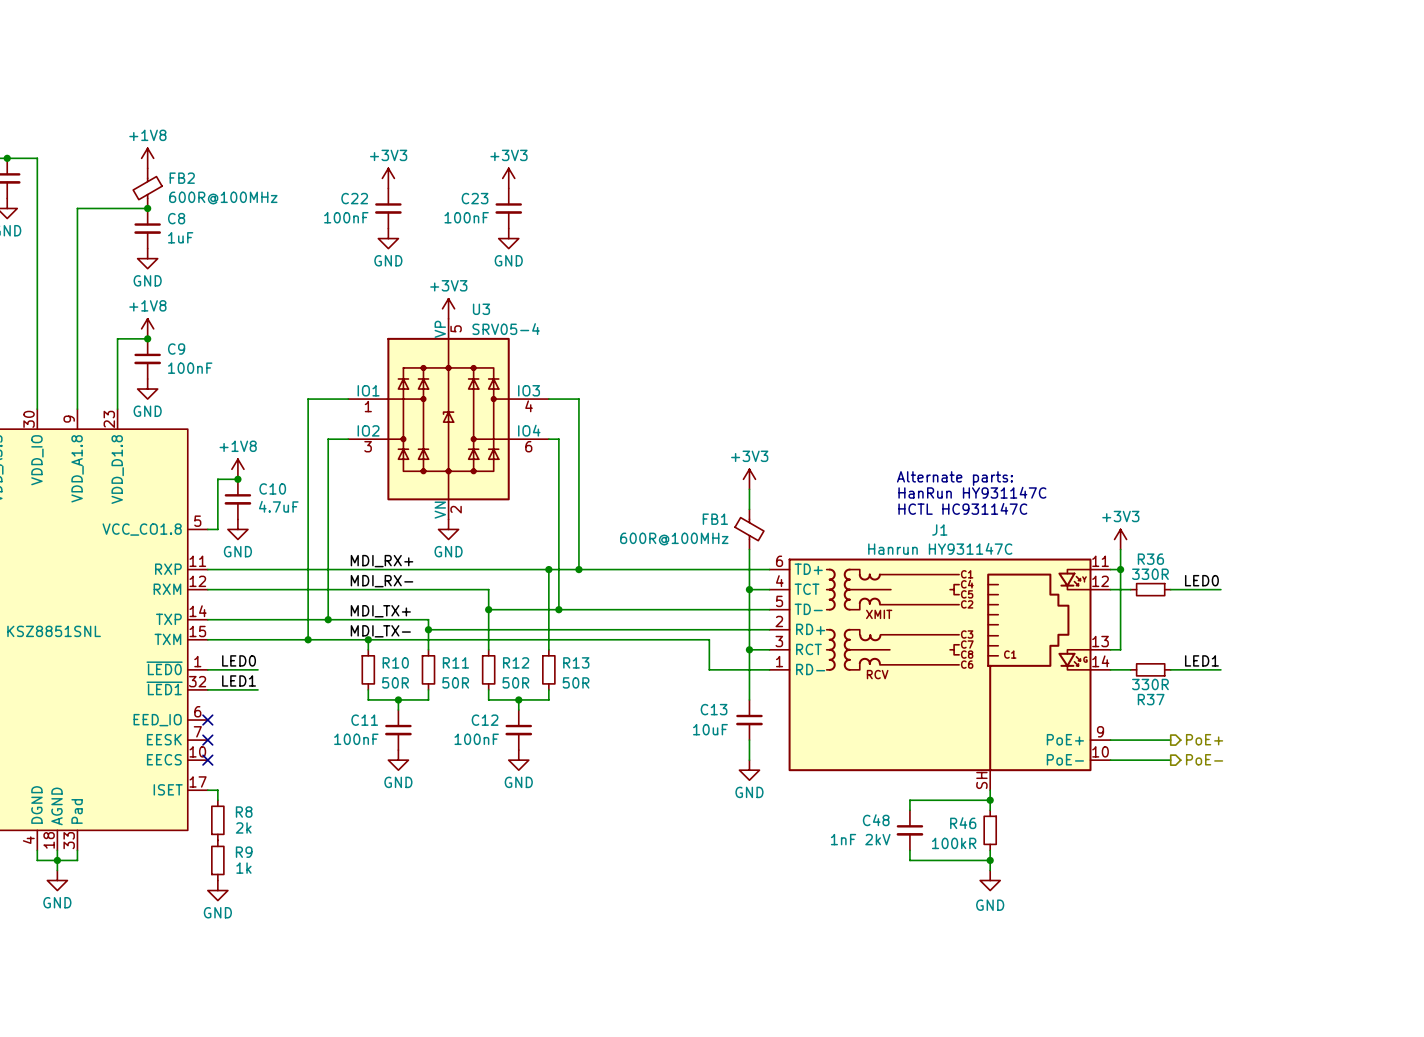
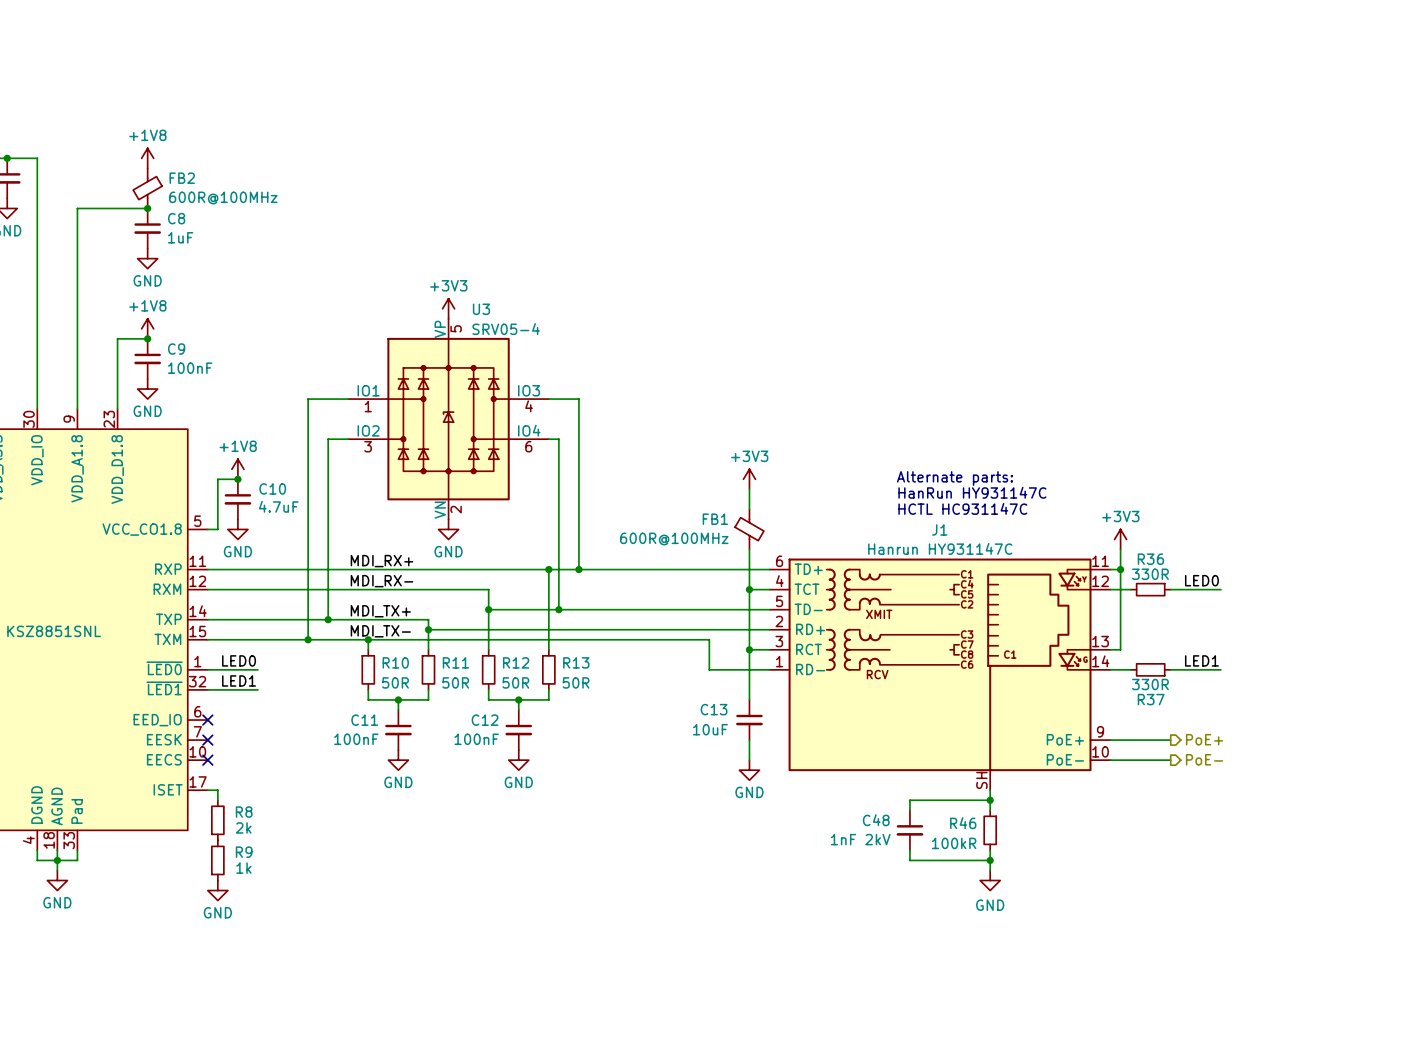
power symbol: +3V3 (388, 178) -> none
power symbol: +3V3 (508, 178) -> none
C22: 100nF (388, 208) -> none
C23: 100nF (508, 208) -> none
power symbol: GND (388, 238) -> none
power symbol: GND (508, 238) -> none

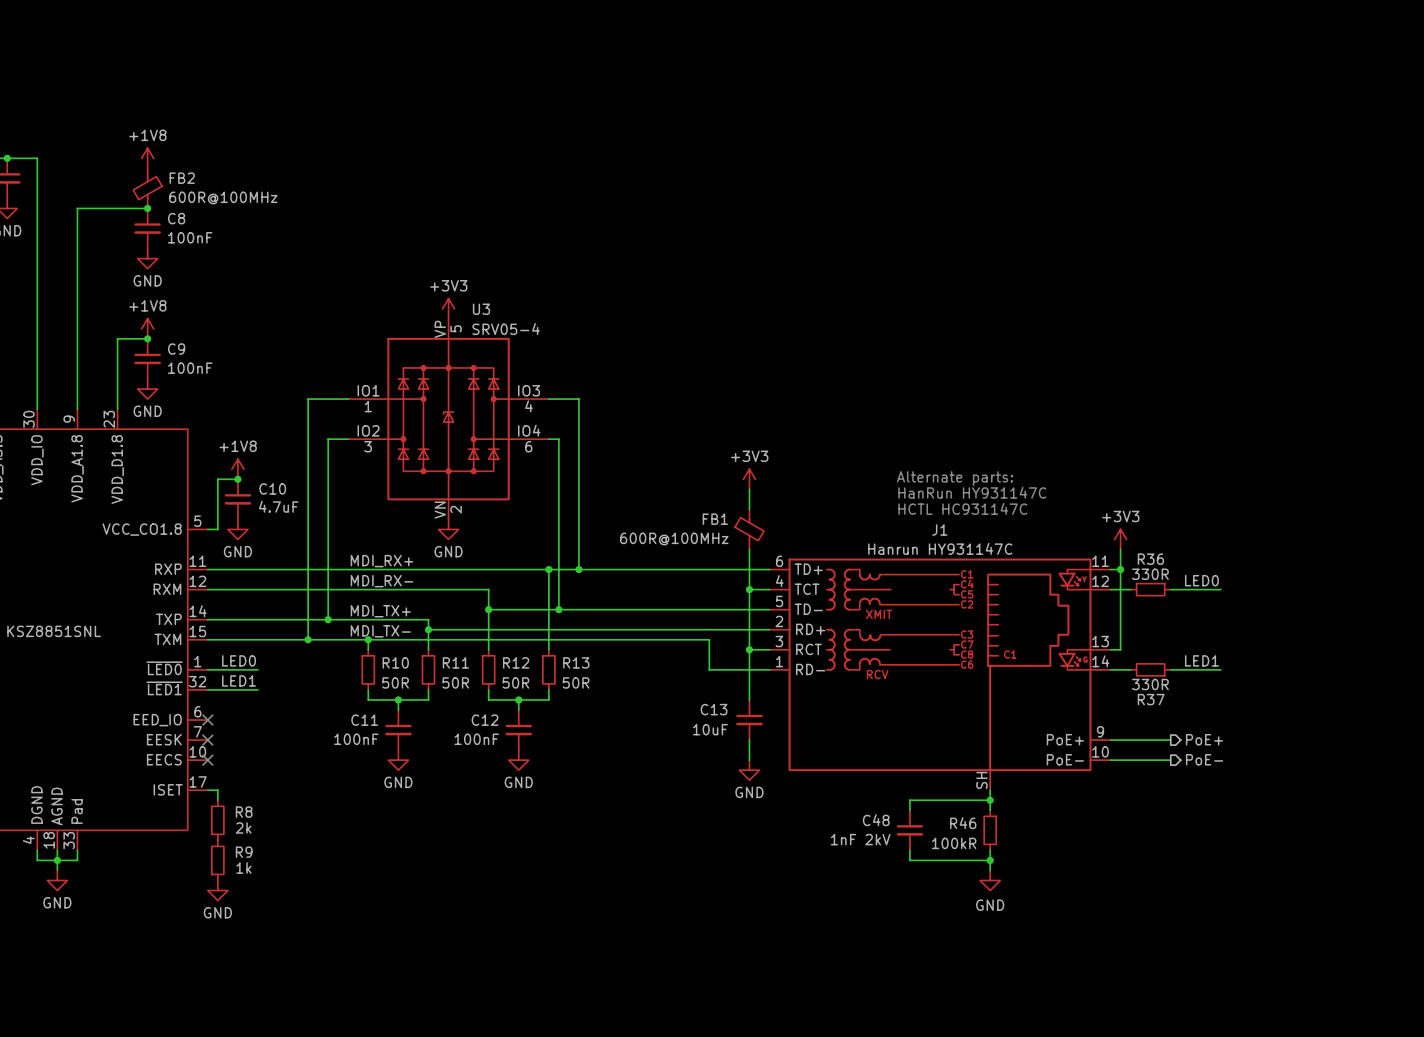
C8 value: 1uF (180, 237) -> 100nF (190, 237)

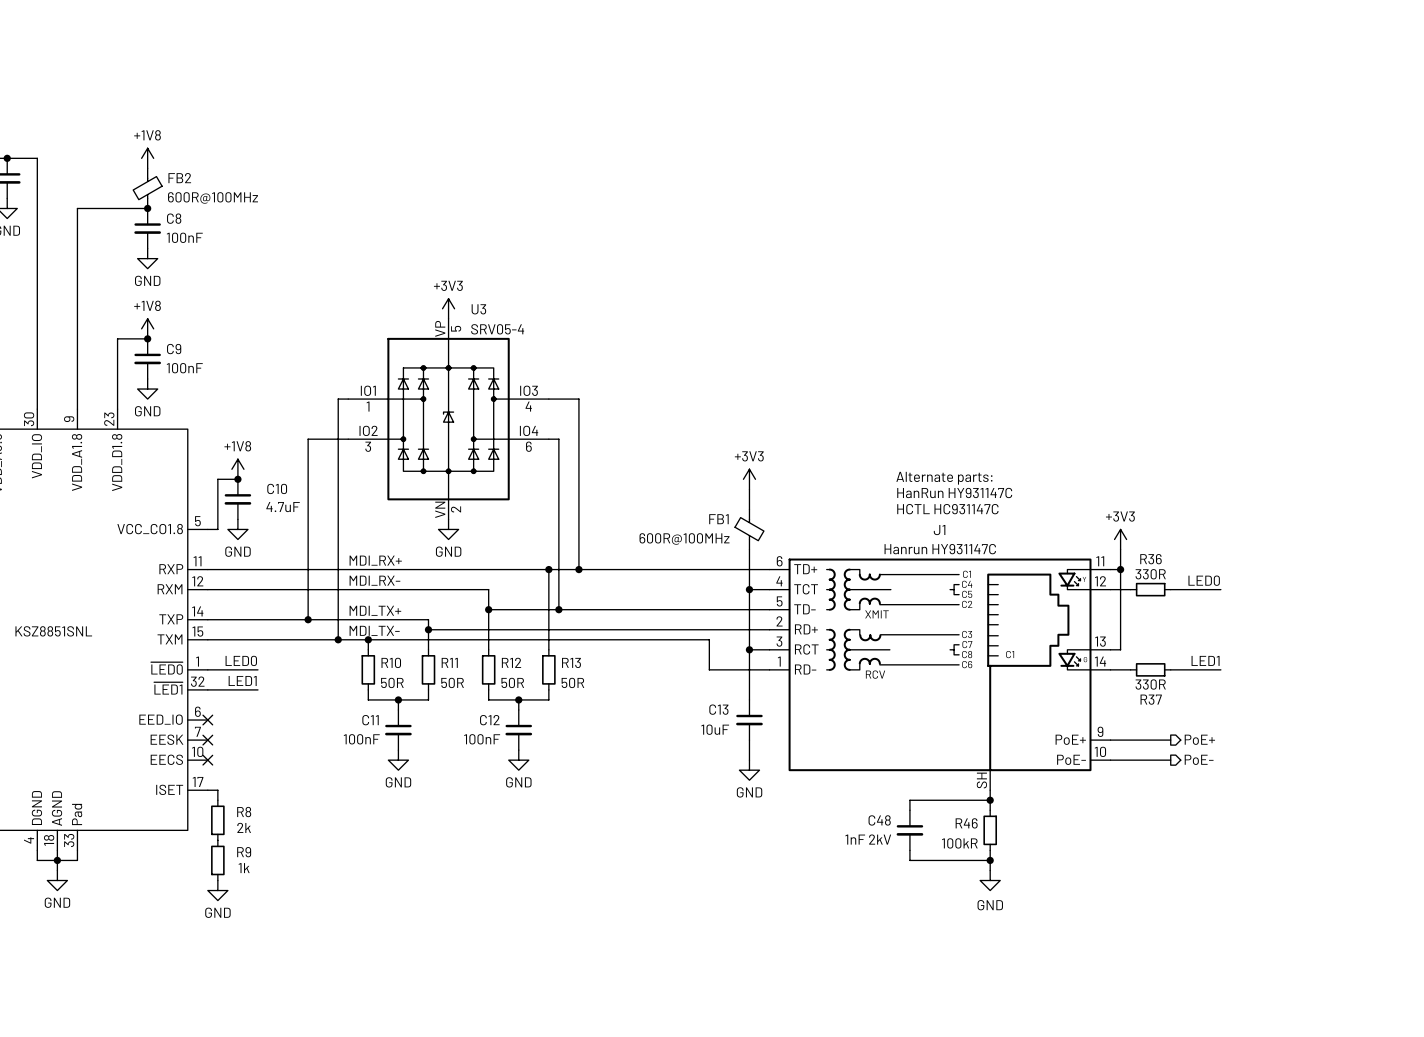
wire: (338, 399) (308, 399) (308, 439) -> (328, 439) (308, 439)
wire: none -> (338, 399) (338, 639)
wire: (328, 439) (328, 619) -> none
wire: (308, 619) (308, 639) -> none
junction: none -> (308, 619)
junction: (328, 619) -> none
junction: (308, 639) -> none
junction: none -> (338, 639)

